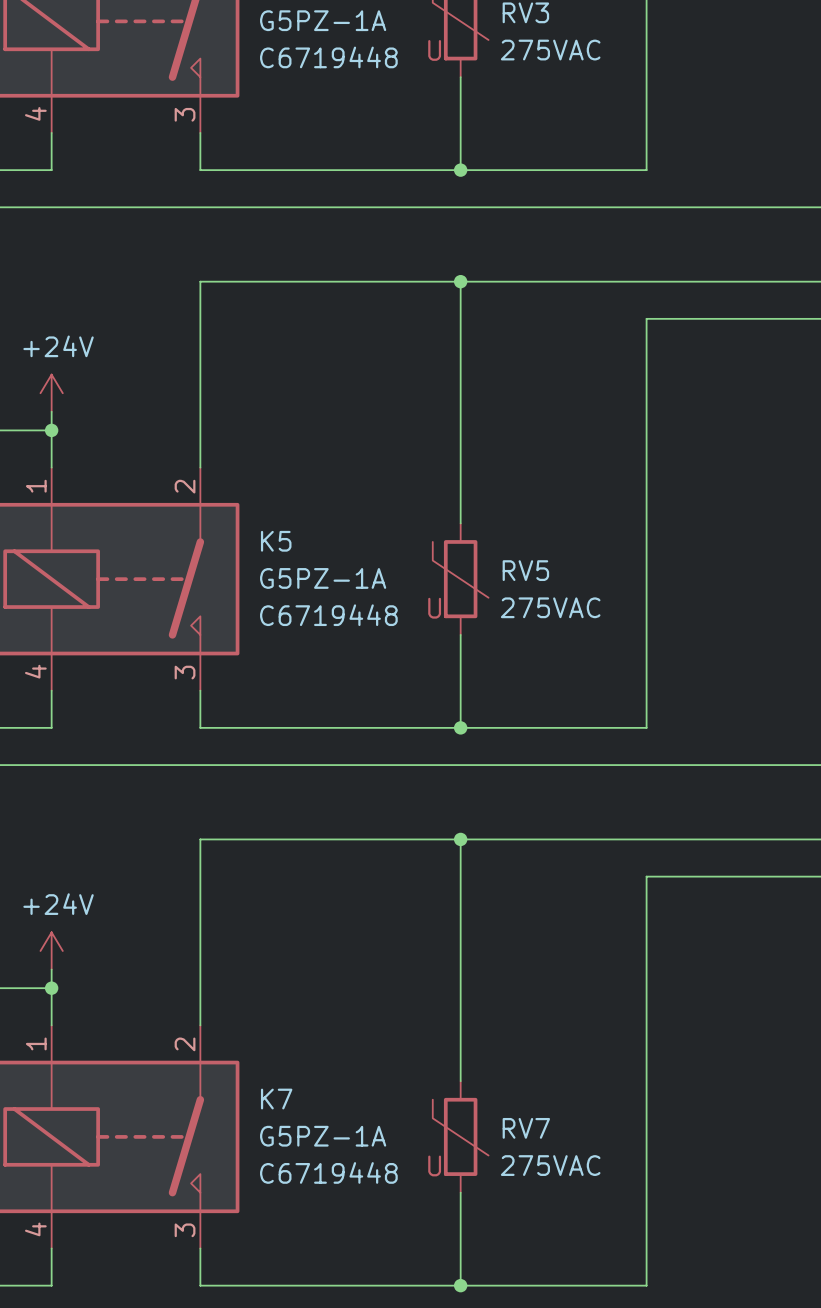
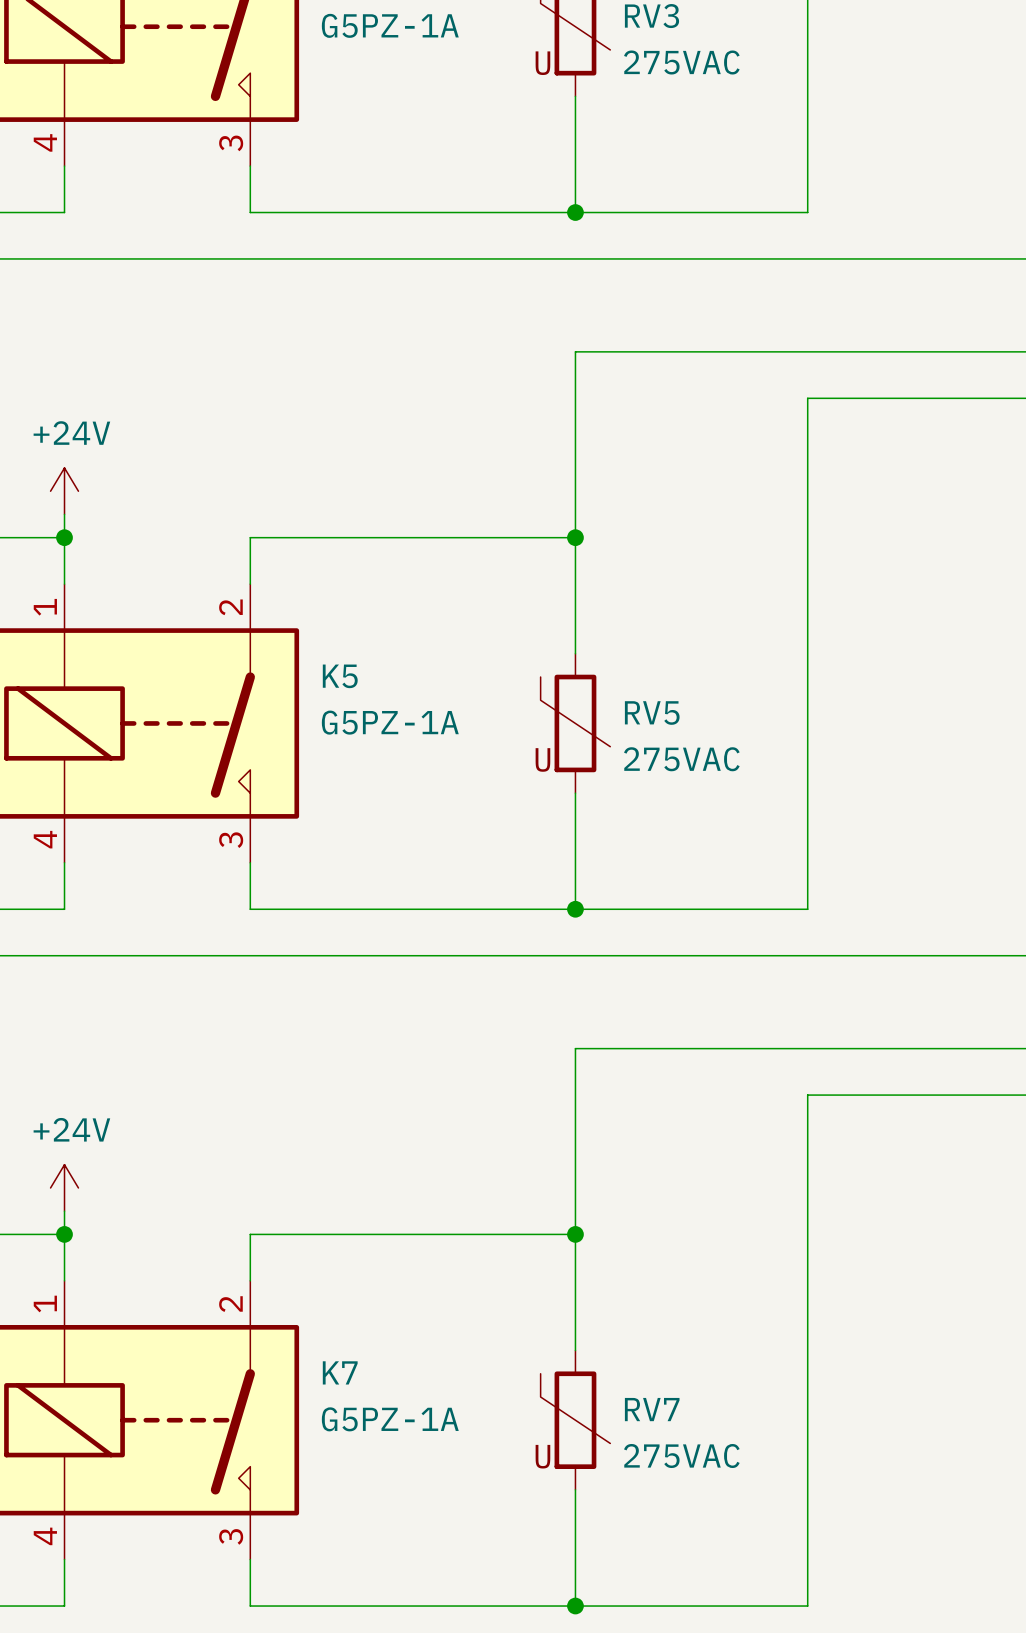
part text: C6719448 (328, 57) -> none
wire: (460, 281) (200, 281) (200, 430) -> (575, 537) (250, 537)
junction: (460, 281) -> none
junction: none -> (575, 537)
K5 text: C6719448 (328, 615) -> none
wire: (460, 839) (200, 839) (200, 988) -> (575, 1234) (250, 1234)
junction: (460, 839) -> none
junction: none -> (575, 1234)
K7 text: C6719448 (328, 1172) -> none

